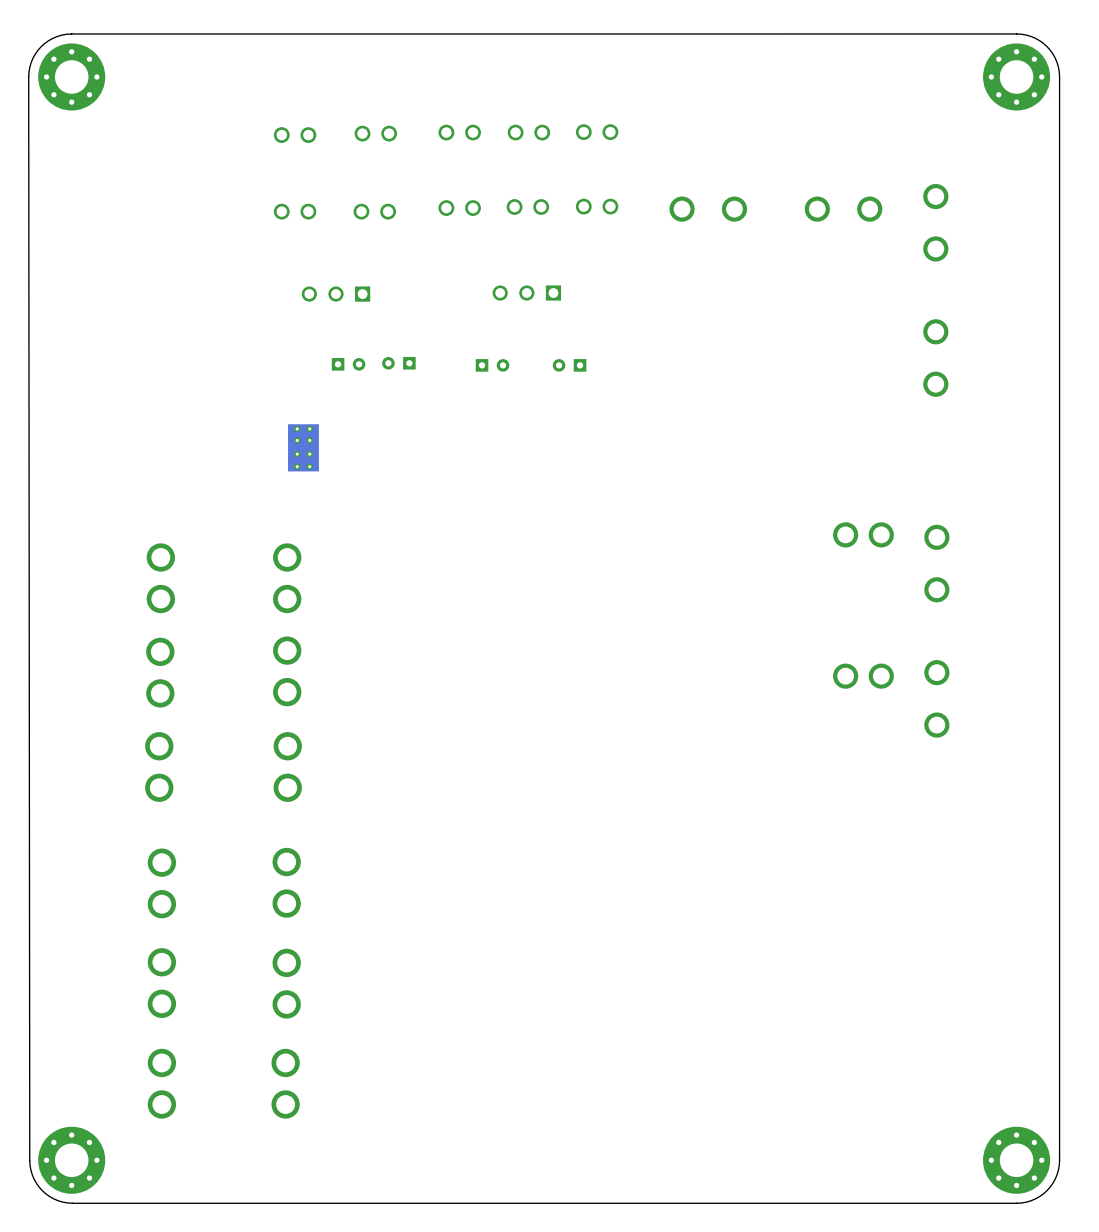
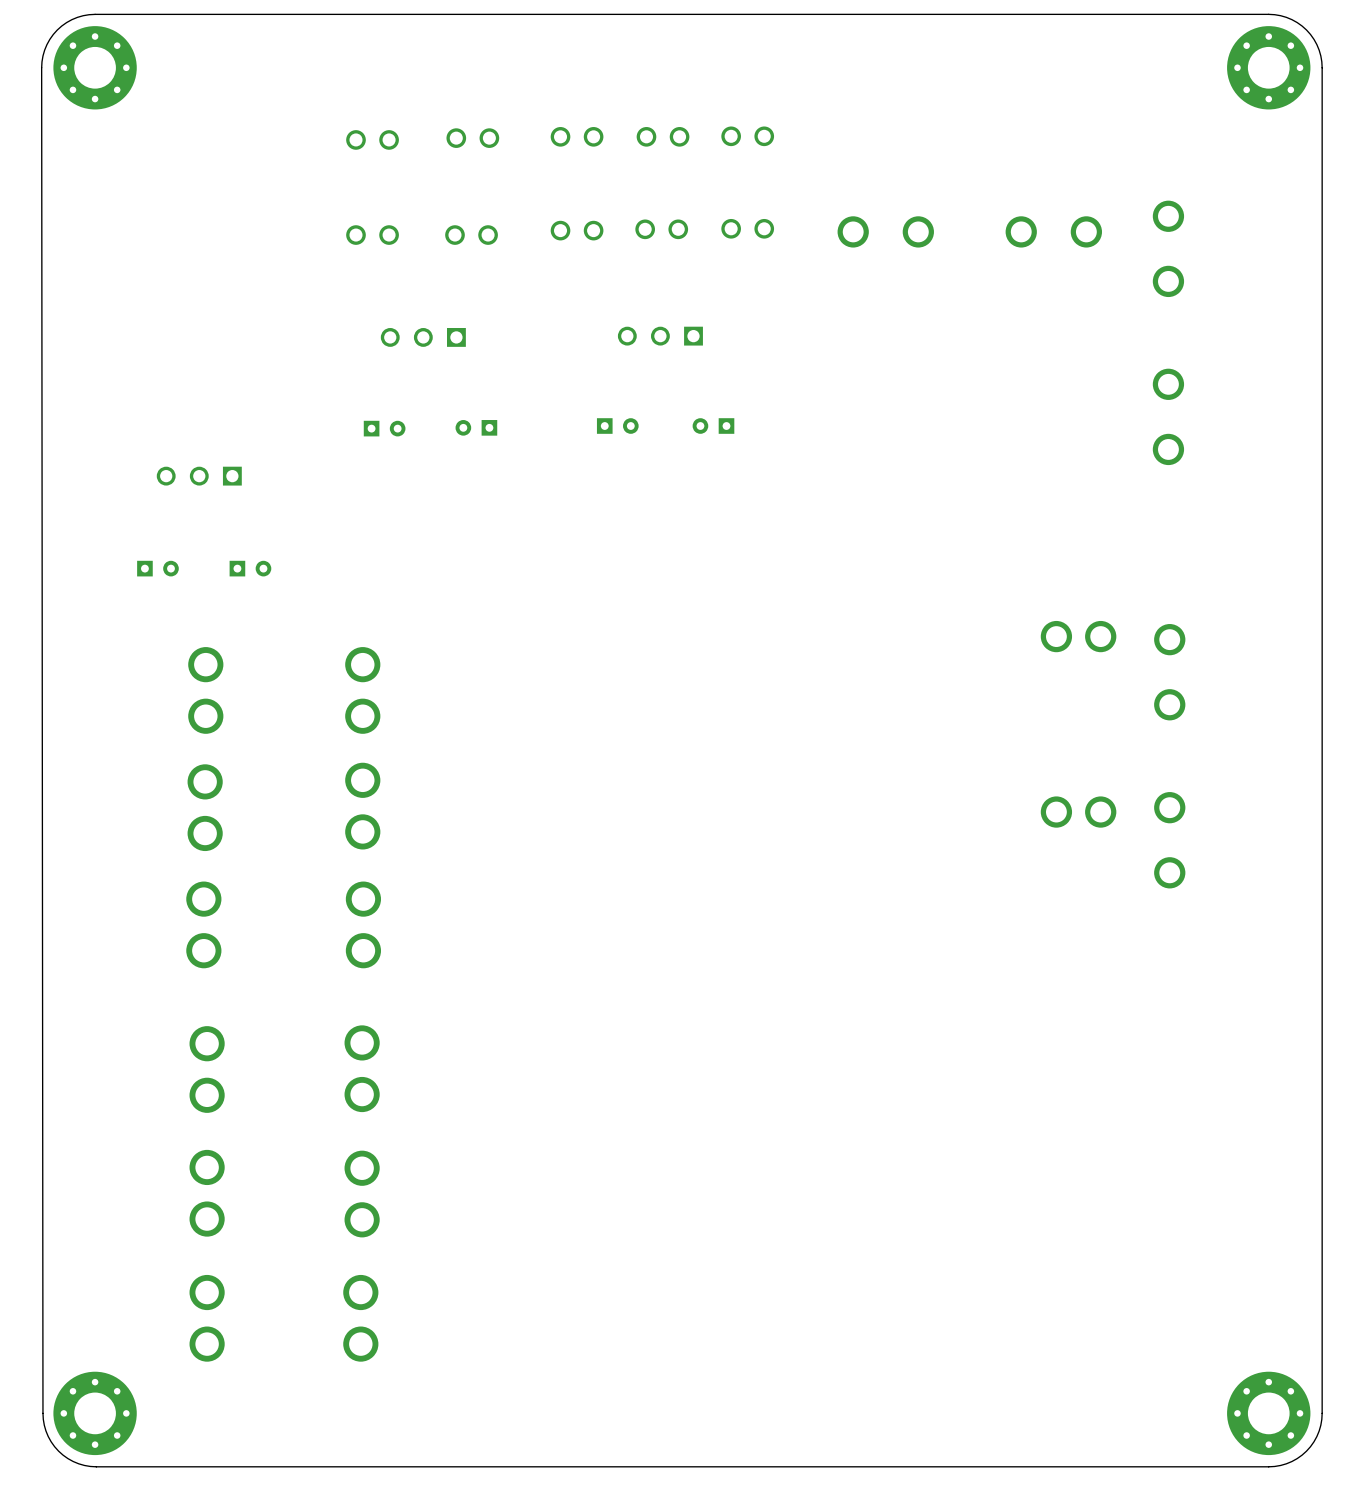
part: (398, 363) -> none
part: (348, 364) -> none
part: none -> (476, 427)
part: none -> (384, 428)
part: none -> (199, 476)
part: (303, 447) -> none
part: none -> (157, 568)
part: none -> (250, 568)

